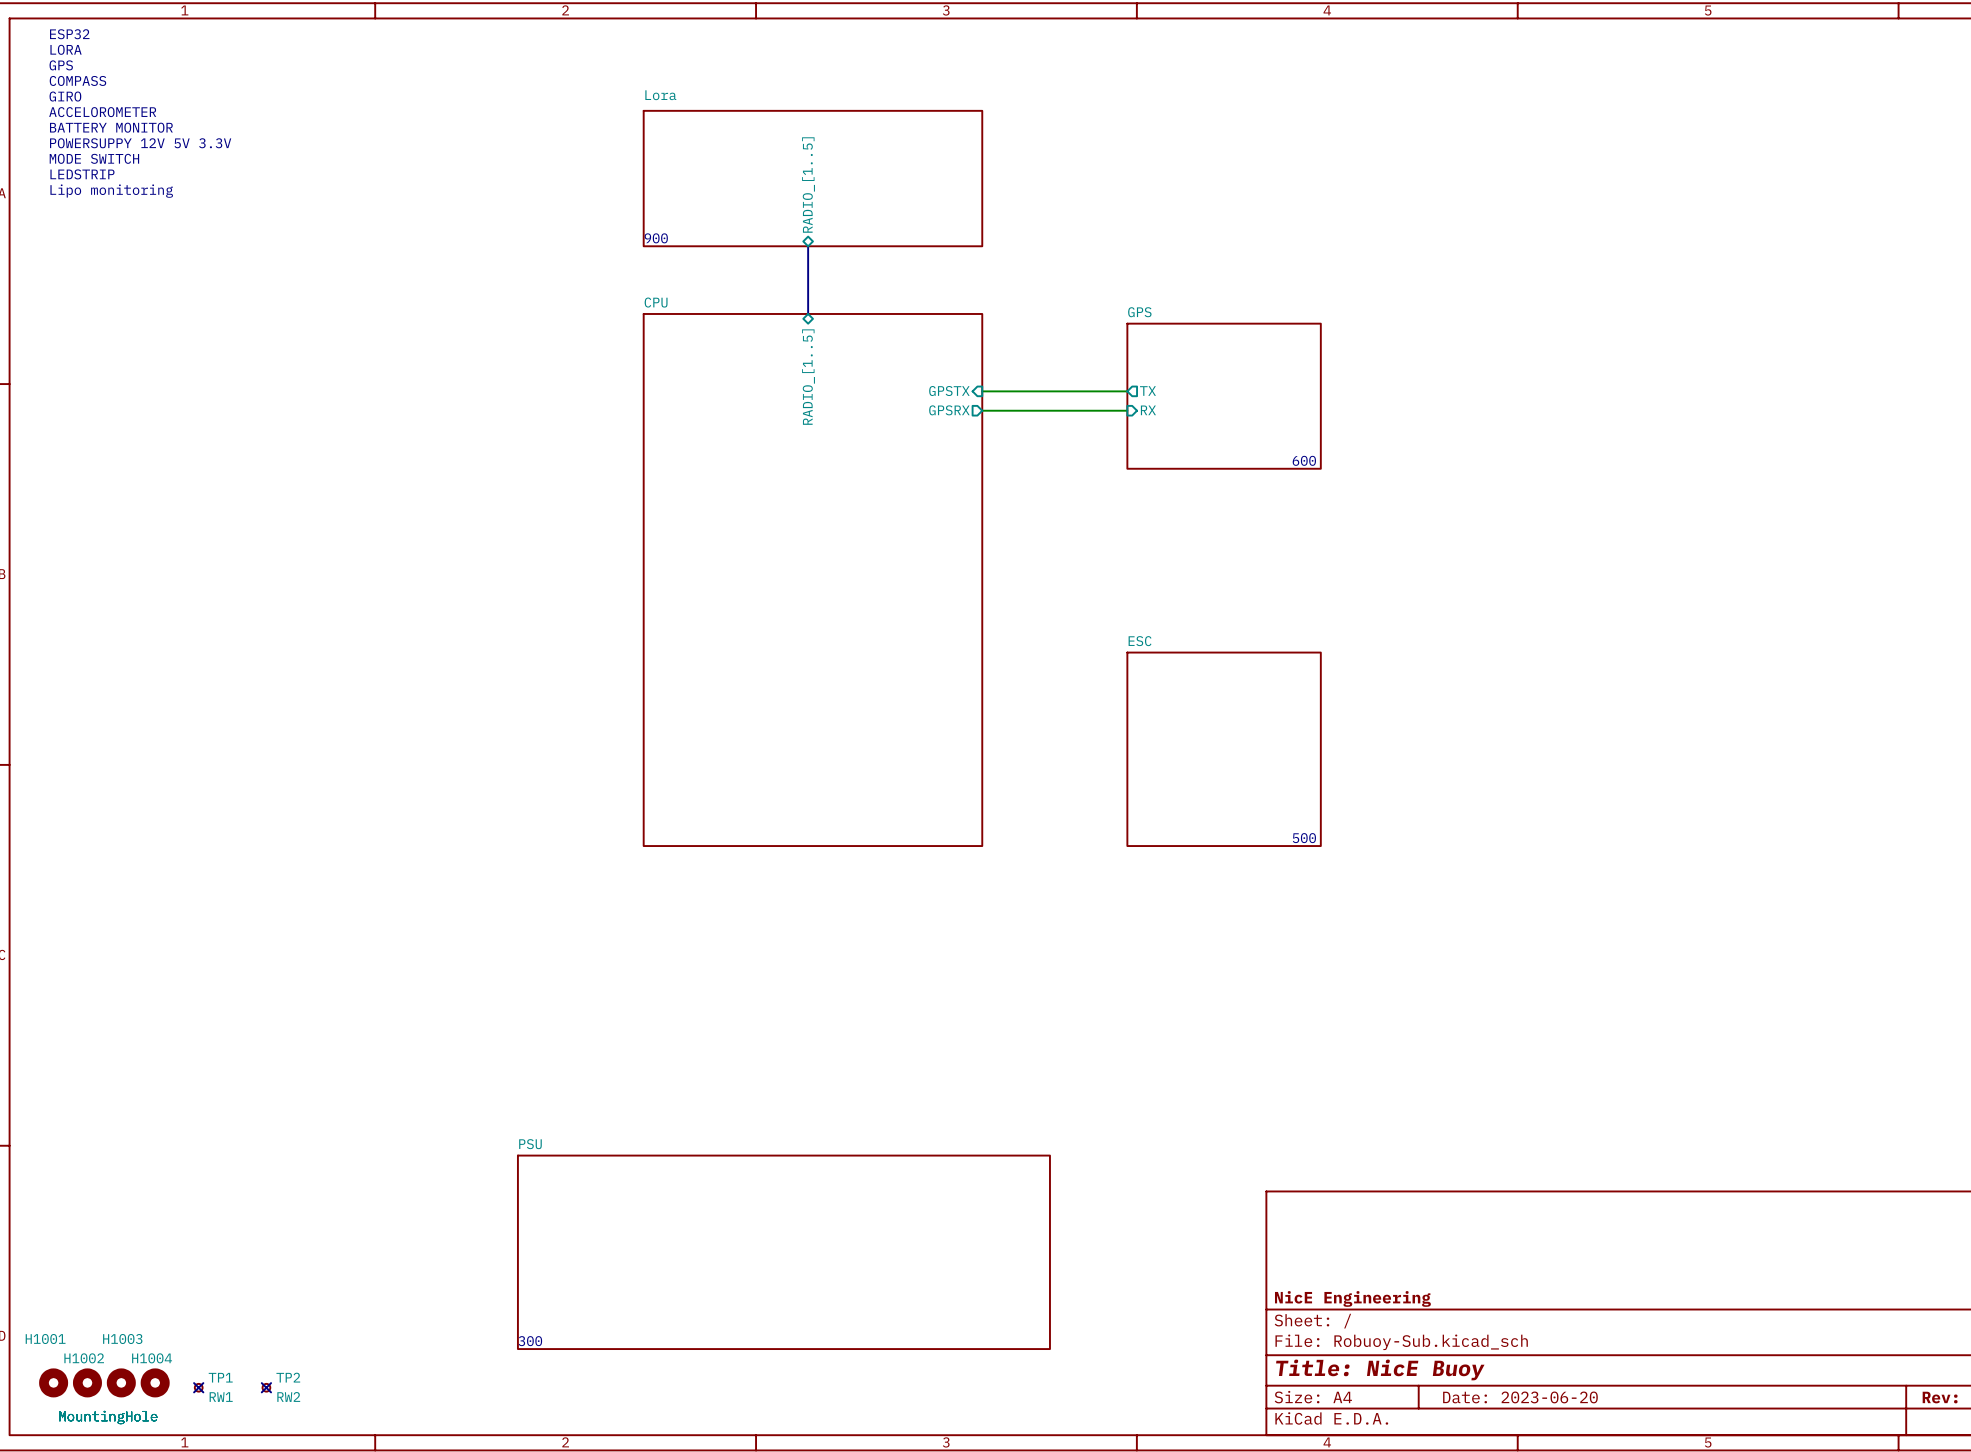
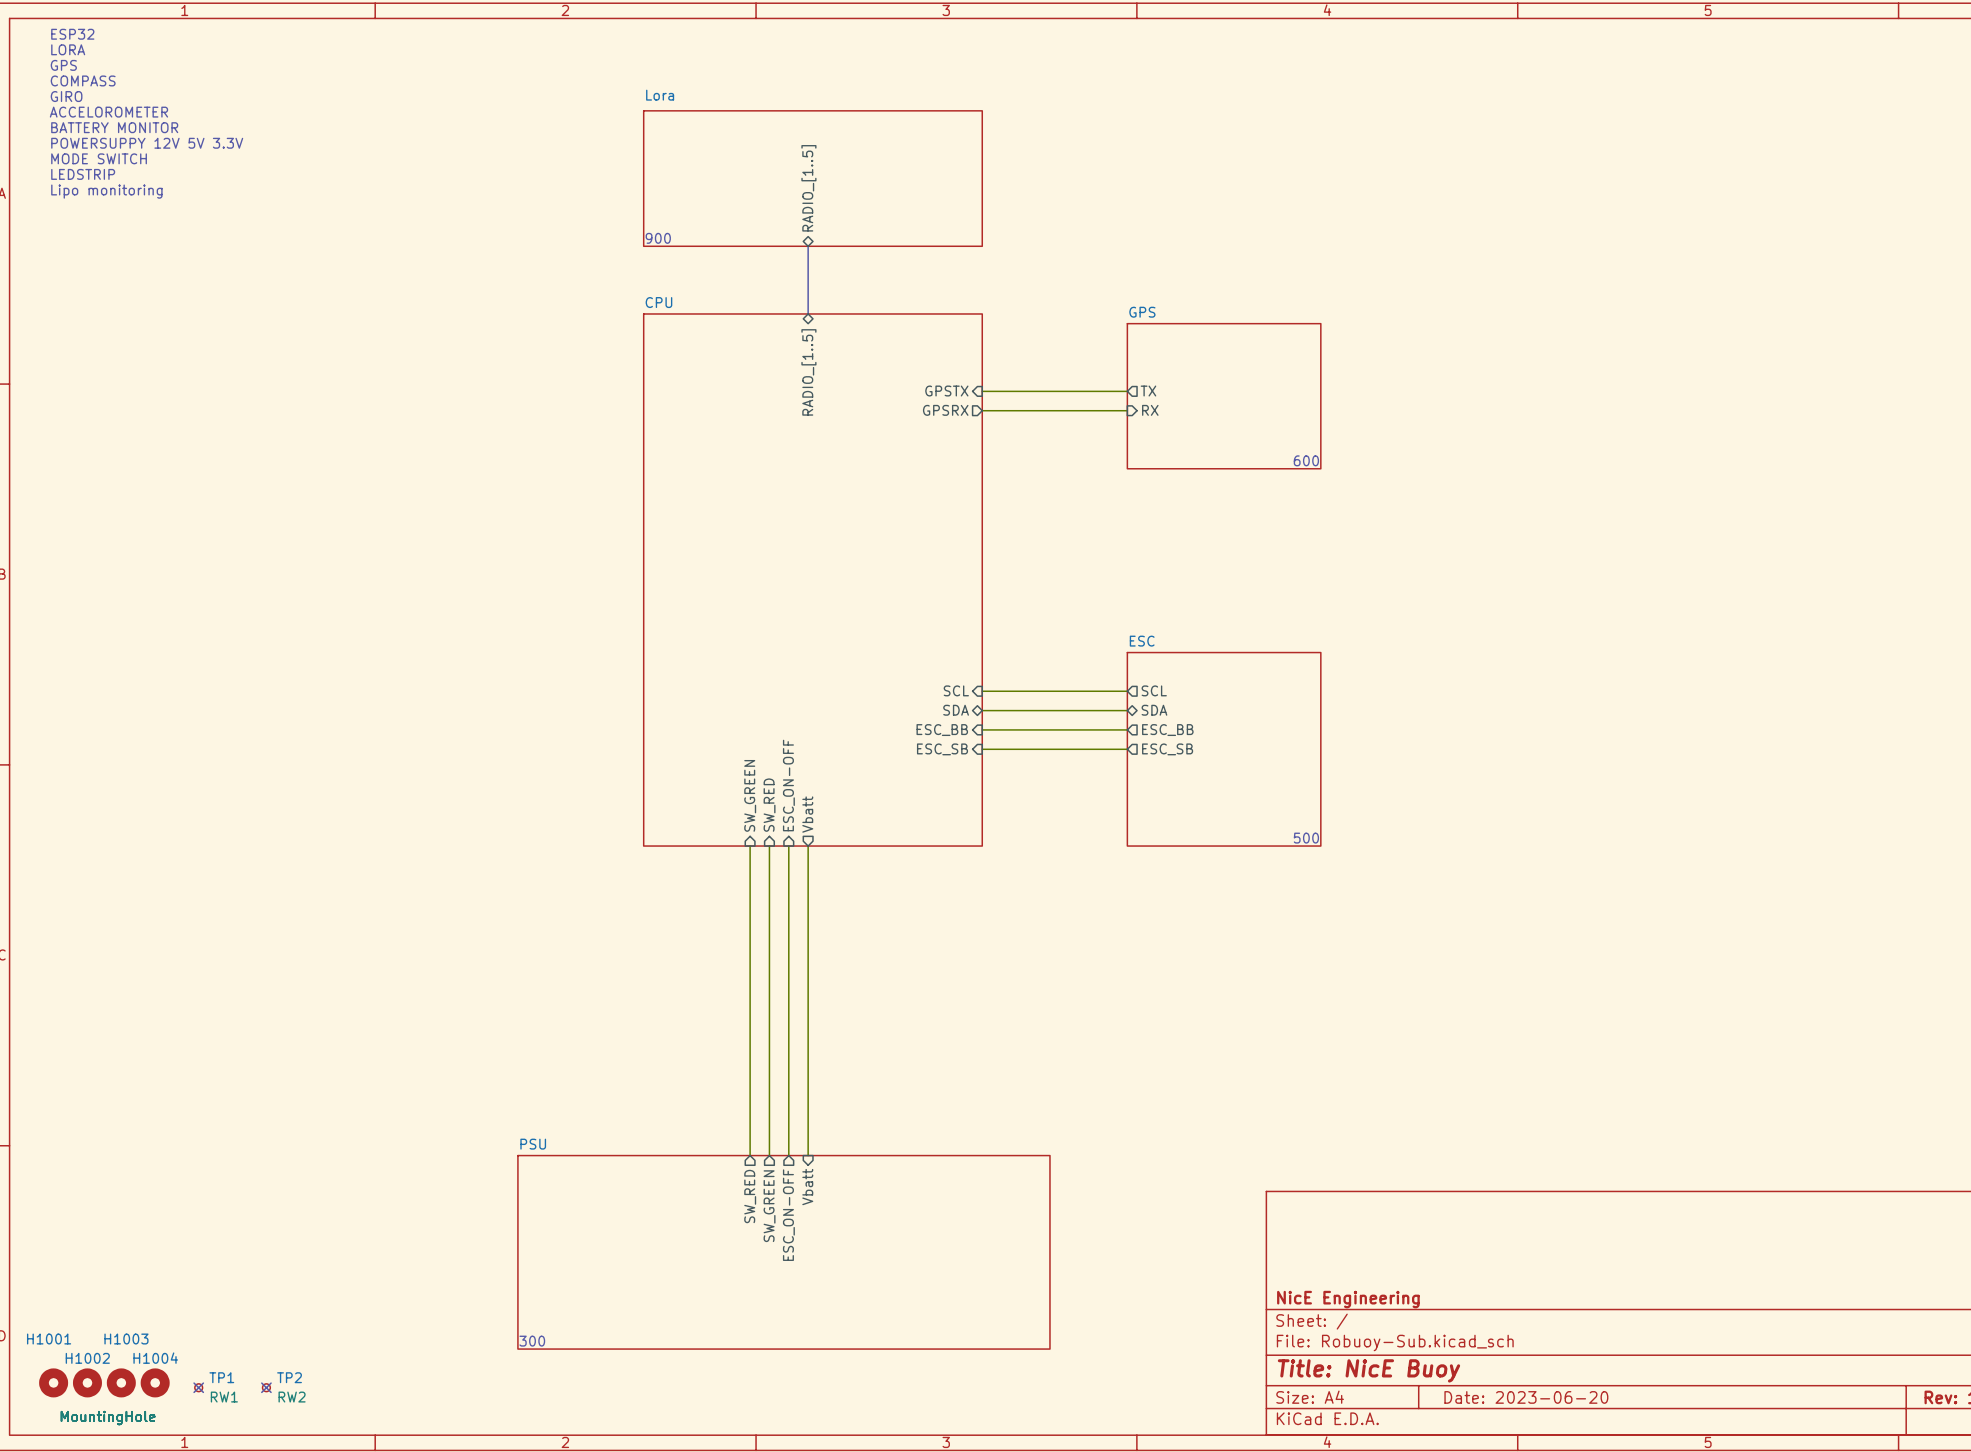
sheet pin: none -> SCL (956, 690)
sheet pin: none -> SCL (1154, 690)
wire: none -> (982, 691) (1127, 691)
sheet pin: none -> SDA (956, 710)
wire: none -> (982, 710) (1127, 710)
sheet pin: none -> SDA (1154, 710)
wire: none -> (982, 729) (1127, 729)
sheet pin: none -> ESC_BB (942, 730)
sheet pin: none -> ESC_BB (1167, 730)
wire: none -> (982, 749) (1127, 749)
sheet pin: none -> ESC_SB (942, 749)
sheet pin: none -> ESC_SB (1167, 749)
sheet pin: none -> ESC_ON-OFF (788, 785)
sheet pin: none -> SW_GREEN (750, 795)
sheet pin: none -> SW_RED (769, 805)
sheet pin: none -> Vbatt (807, 814)
wire: none -> (750, 846) (750, 1155)
wire: none -> (769, 846) (769, 1155)
wire: none -> (788, 846) (788, 1155)
wire: none -> (808, 846) (808, 1155)
sheet pin: none -> Vbatt (807, 1187)
sheet pin: none -> SW_RED (750, 1196)
sheet pin: none -> SW_GREEN (769, 1206)
sheet pin: none -> ESC_ON-OFF (788, 1215)

